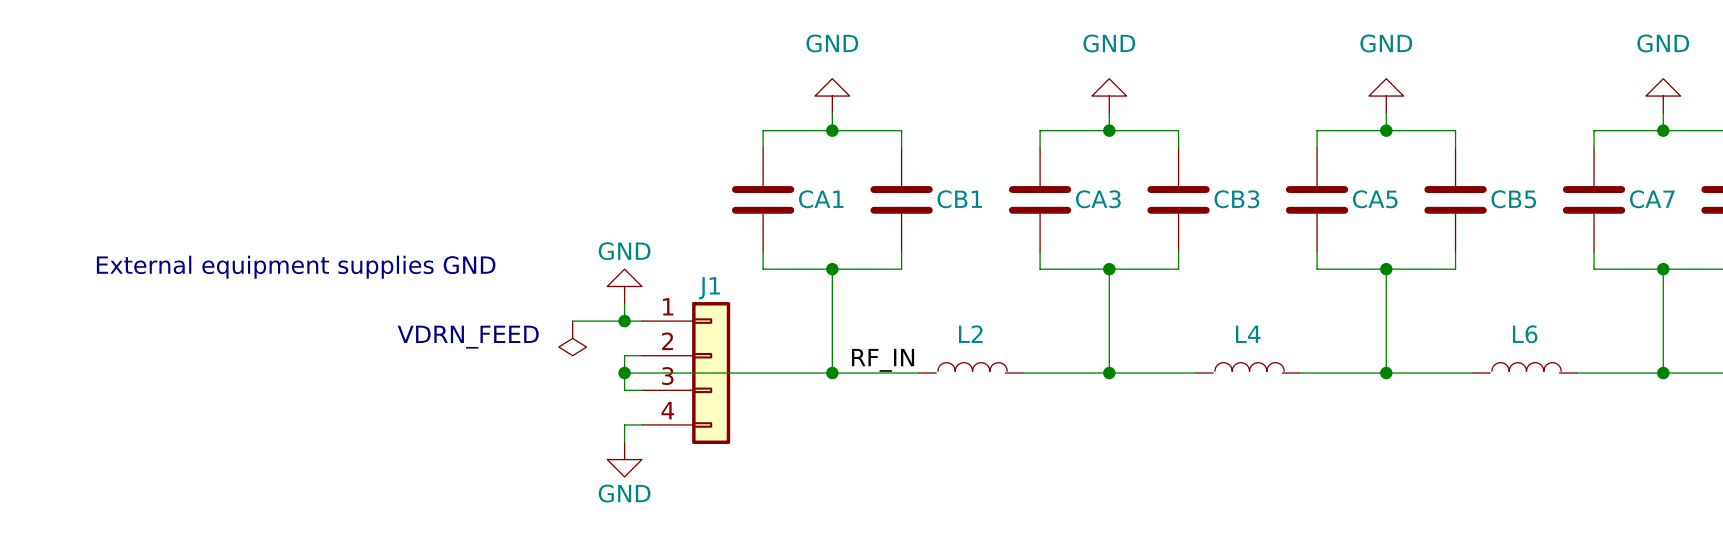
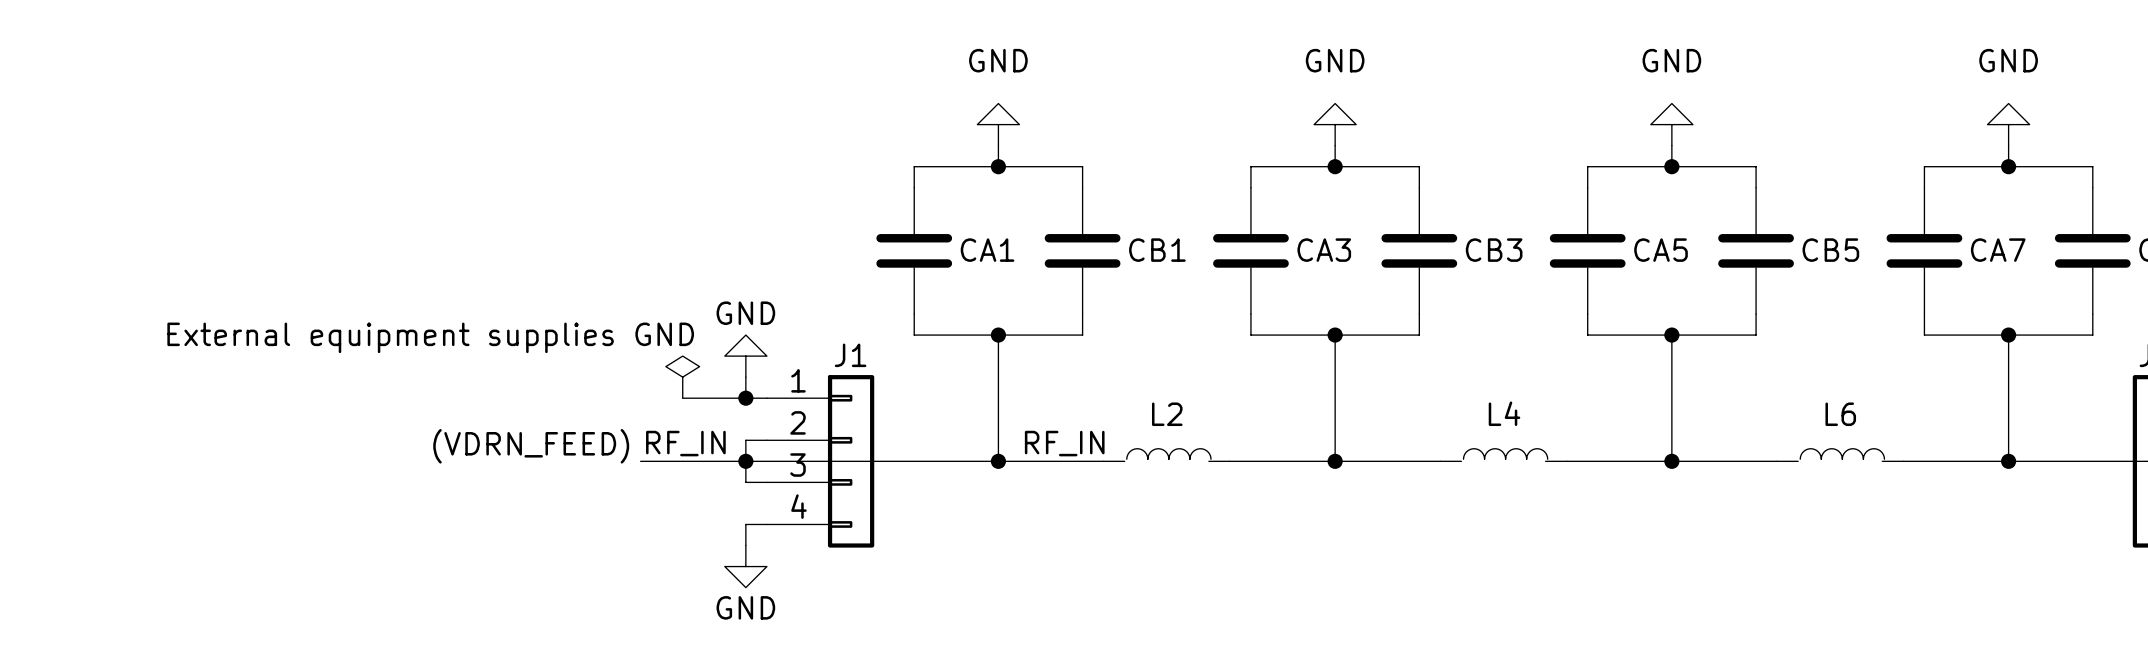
text position: External equipment supplies GND (296, 267) -> External equipment supplies GND (430, 337)
text: VDRN_FEED (468, 337) -> (VDRN_FEED) (531, 446)
power symbol rotation: 0° (572, 338) -> 180° (682, 377)
power symbol position: (572, 338) -> (682, 377)
label: none -> RF_IN (685, 443)
wire: none -> (640, 461) (745, 461)

